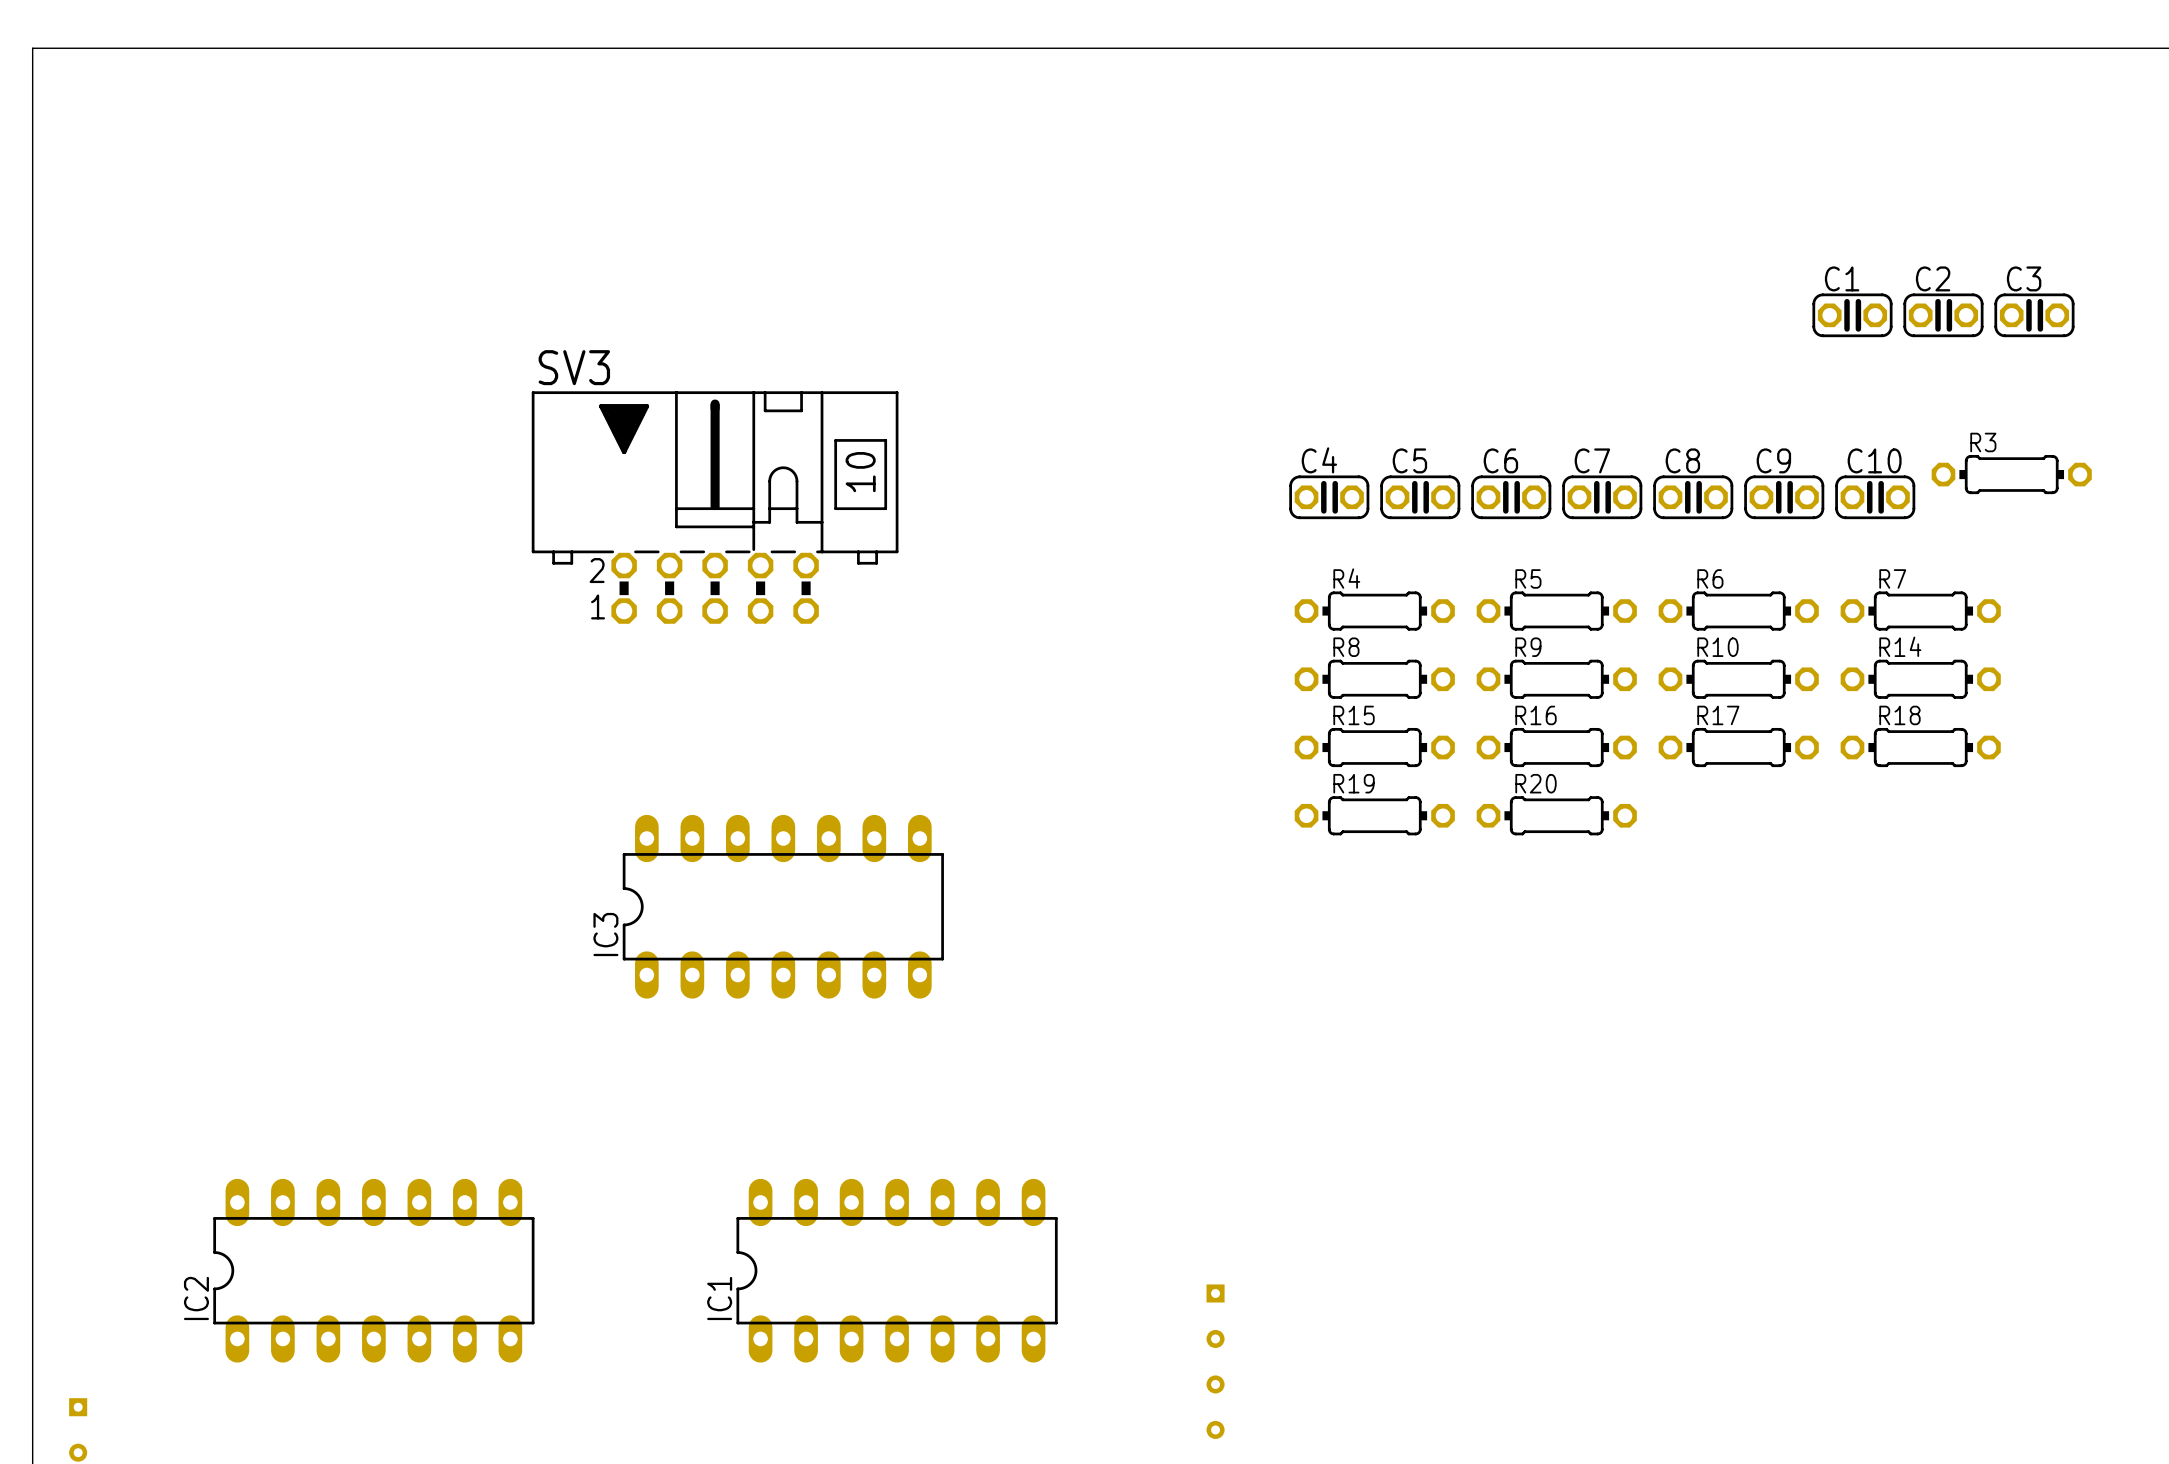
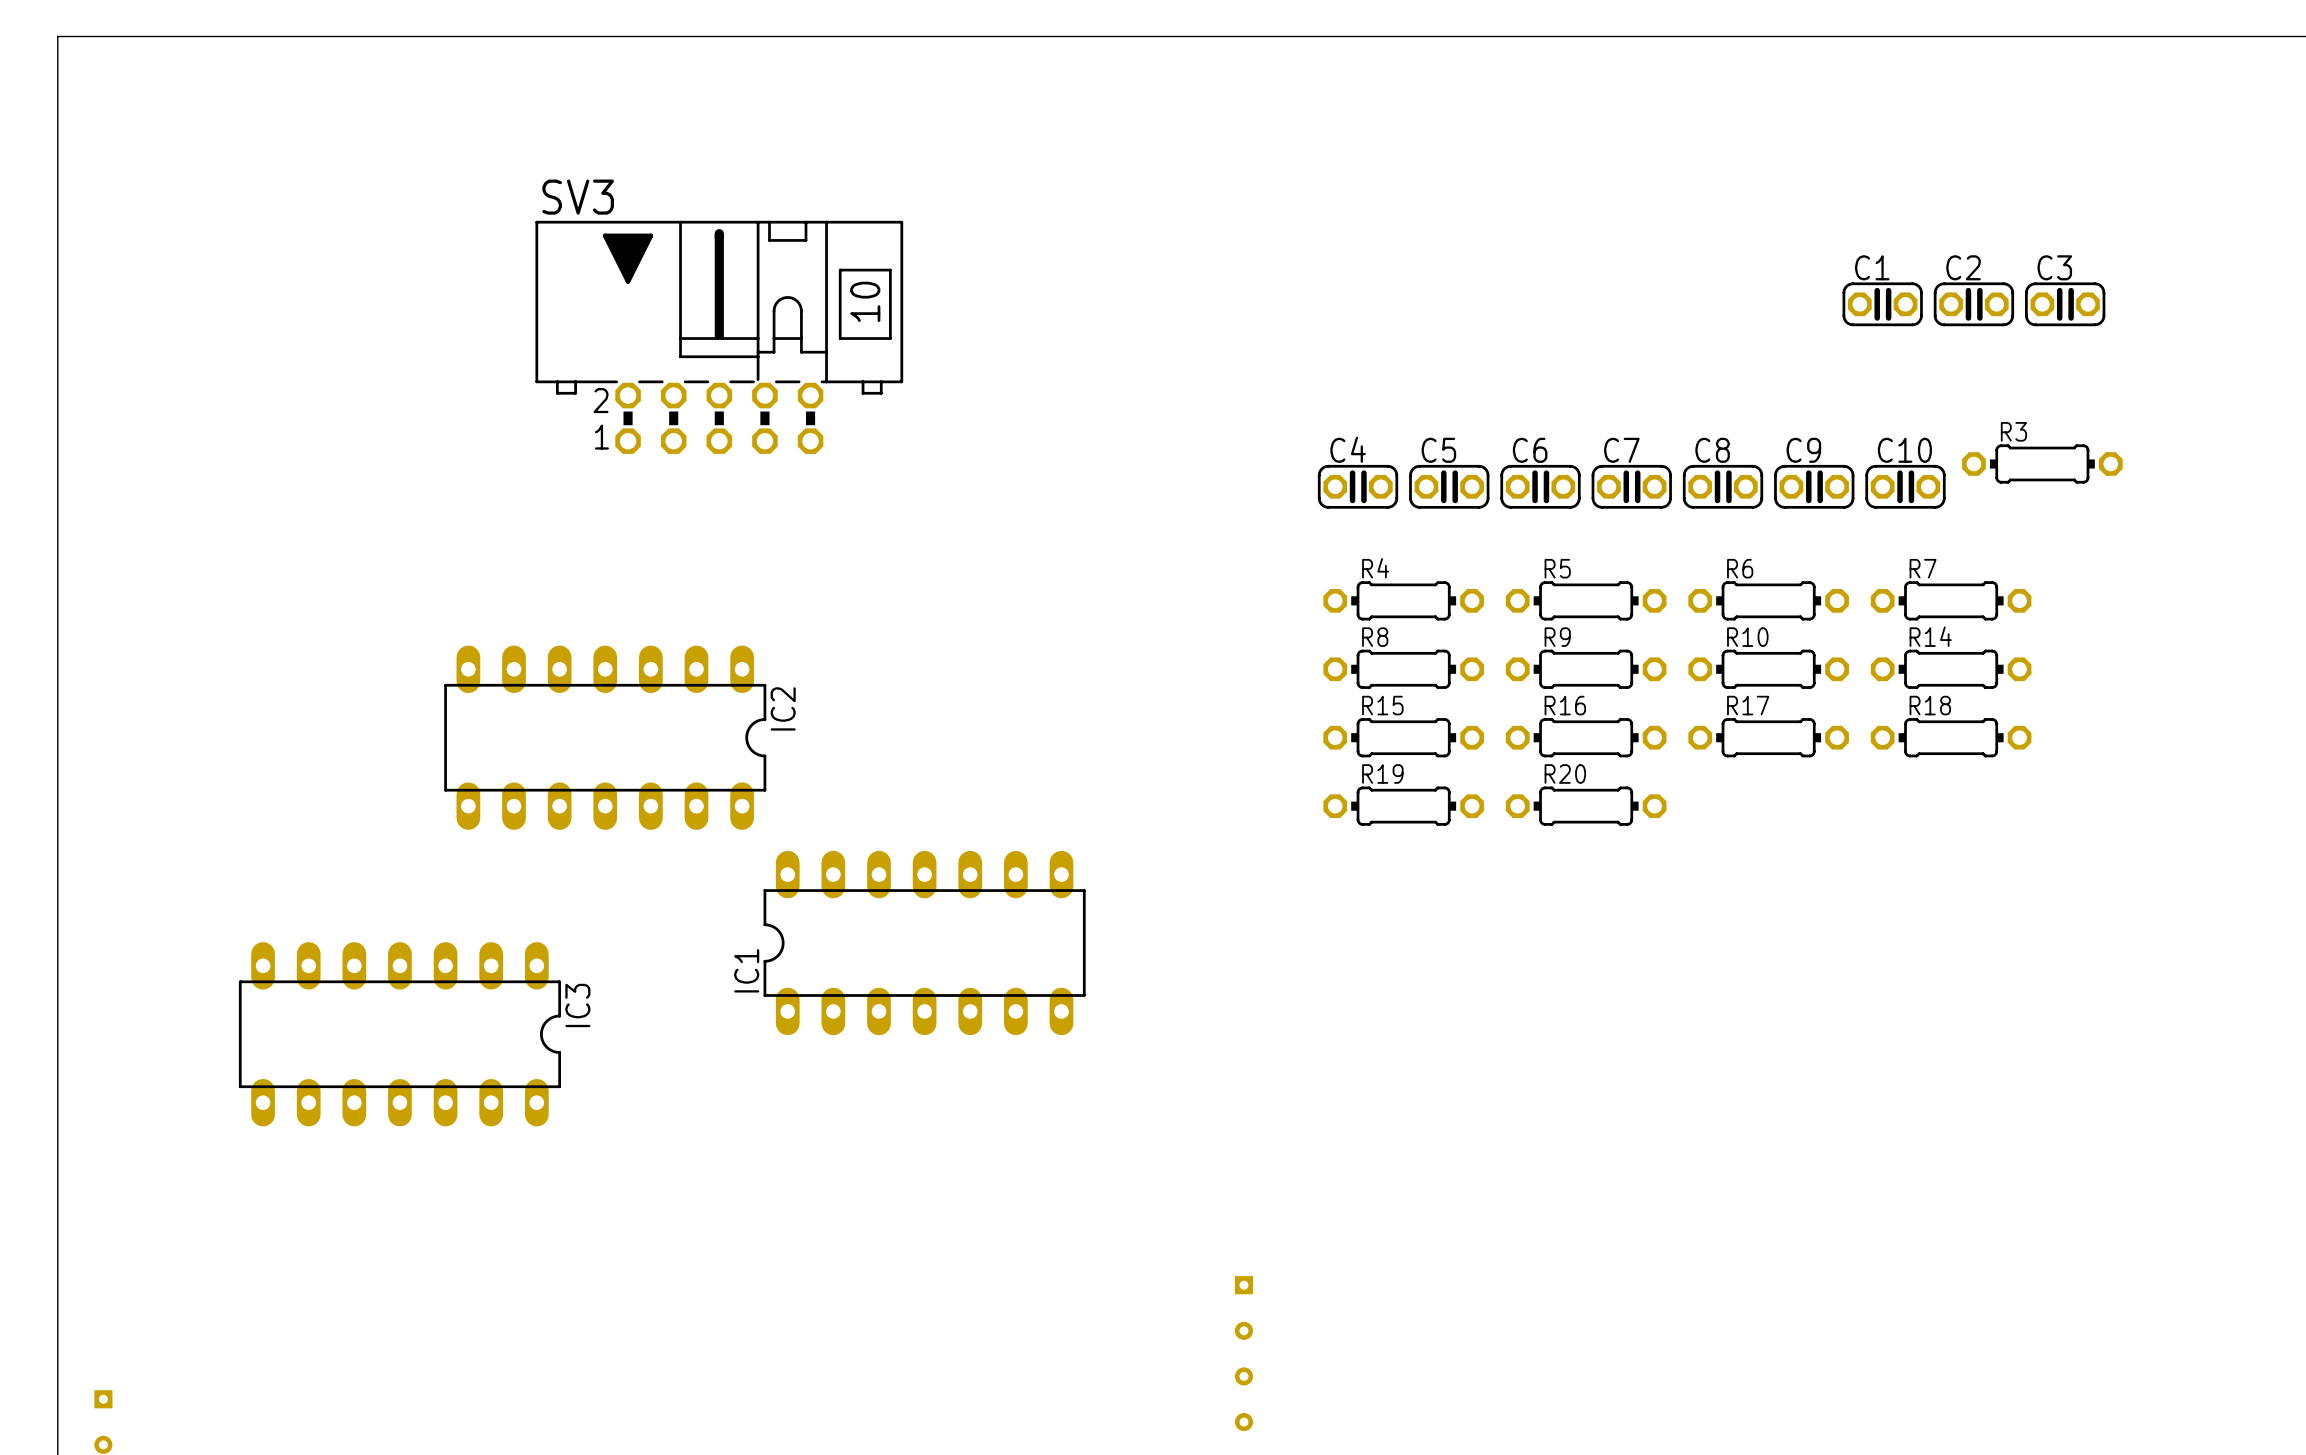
SV3 position: (715, 507) -> (719, 337)
IC3 rotation: 0° (783, 906) -> 180° (399, 1034)
IC3 position: (783, 906) -> (399, 1034)
IC2 rotation: 0° (373, 1270) -> 180° (605, 737)
IC2 position: (373, 1270) -> (605, 737)
IC1 position: (897, 1270) -> (924, 943)

